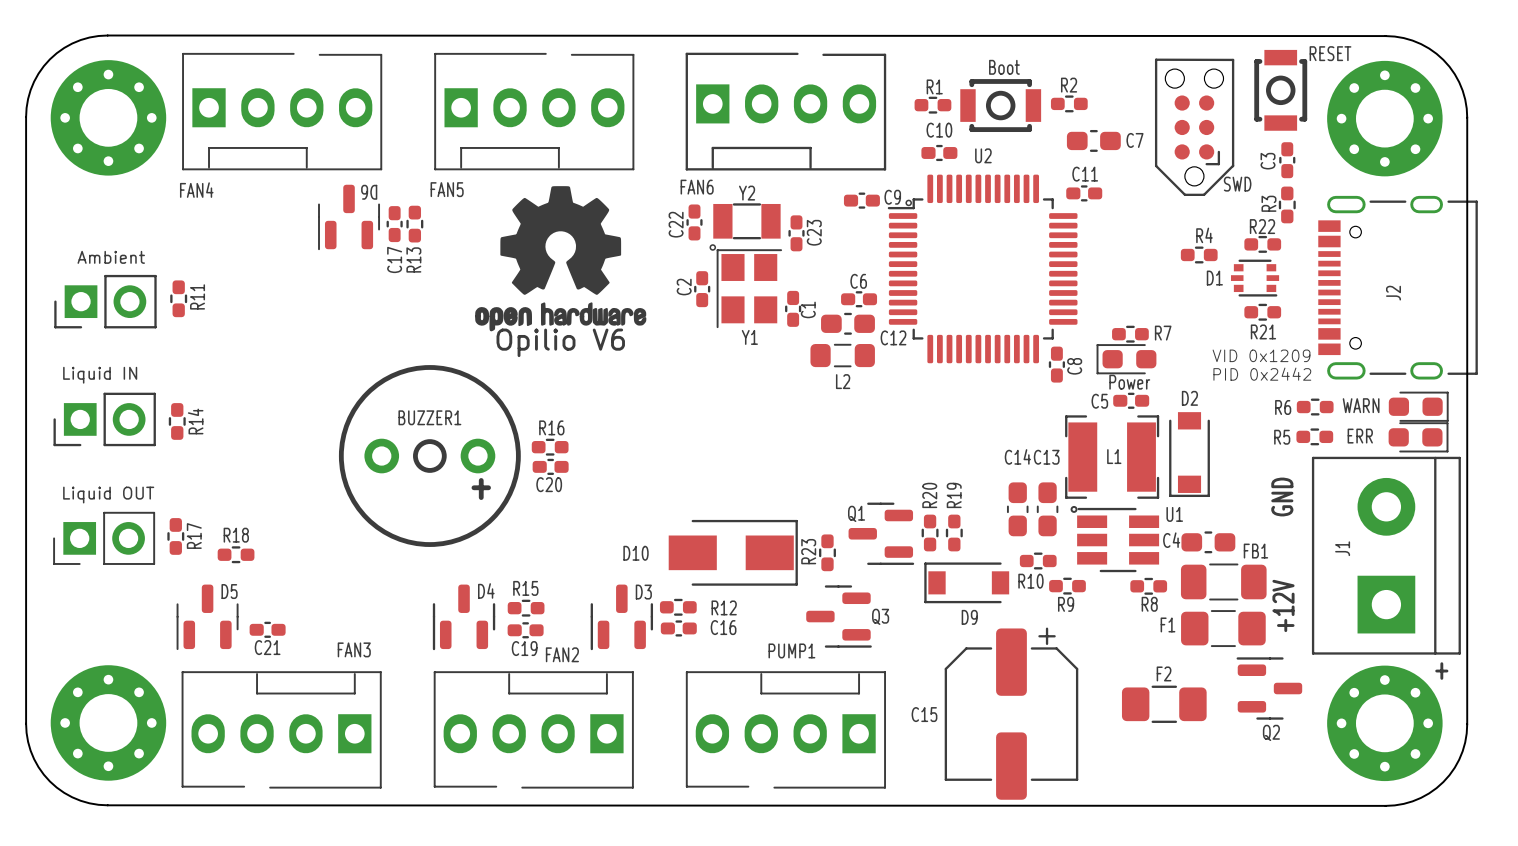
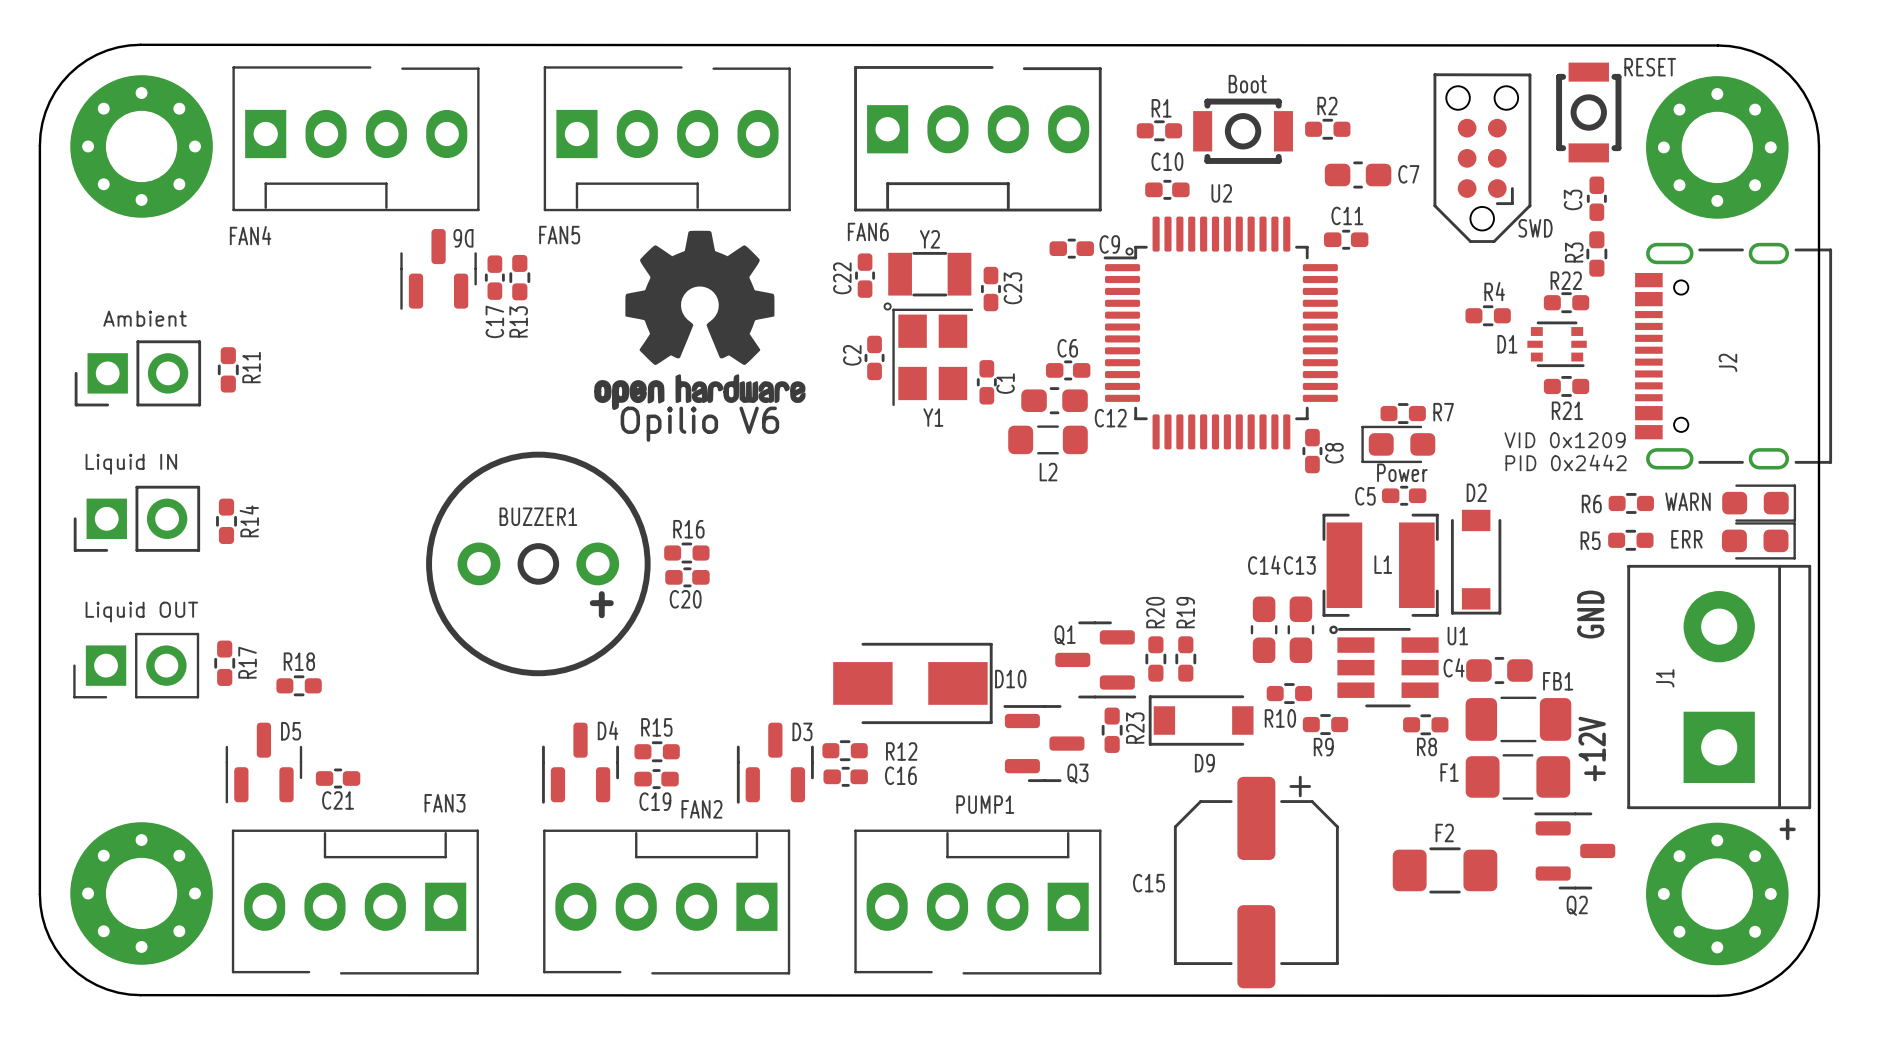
R23 name position: R23 (808, 551) -> R23 (1135, 728)
R23 position: (827, 552) -> (1112, 730)
D10 name position: D10 (636, 553) -> D10 (1010, 679)
Q3 rotation: 0° (839, 616) -> 180° (1043, 743)

